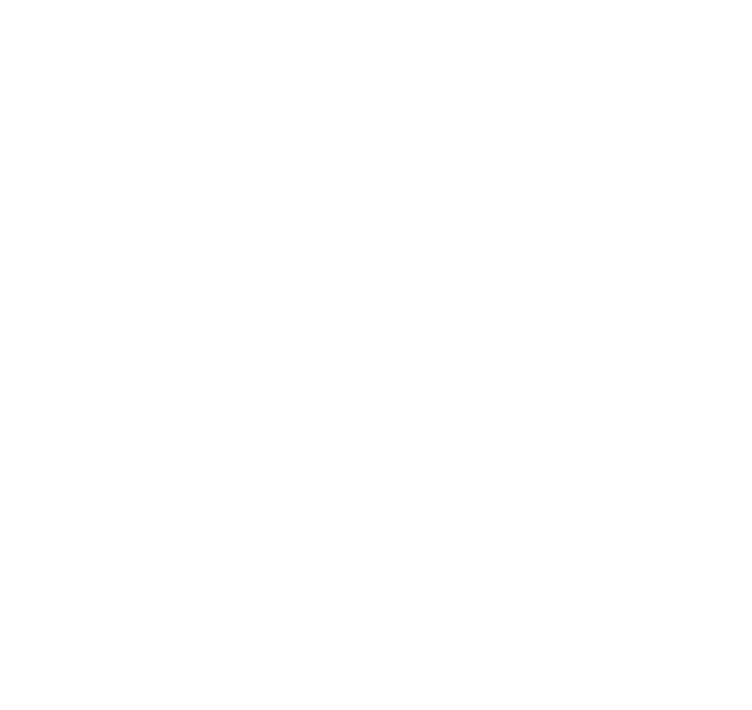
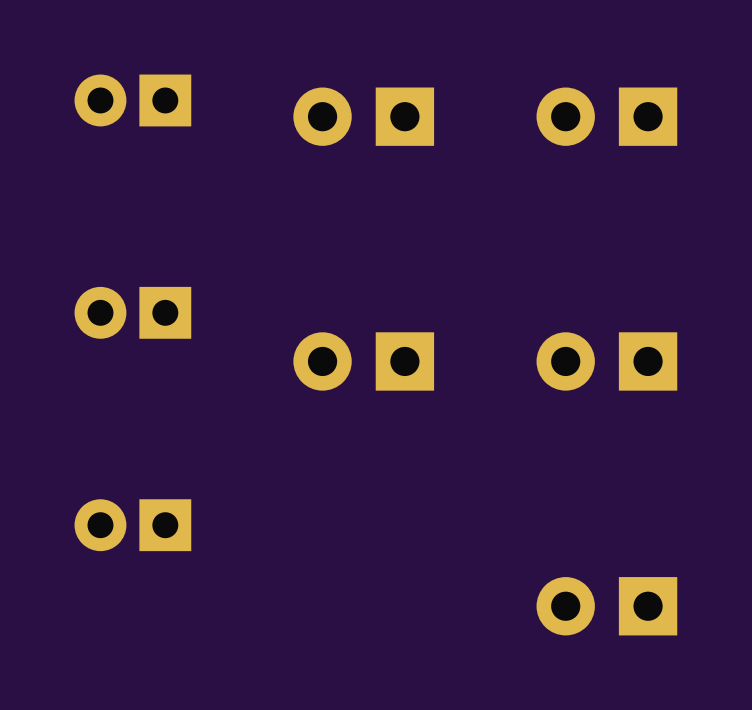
part: none -> (132, 100)
part: none -> (363, 116)
part: none -> (606, 116)
part: none -> (132, 312)
part: none -> (363, 361)
part: none -> (606, 361)
part: none -> (132, 525)
part: none -> (606, 606)

